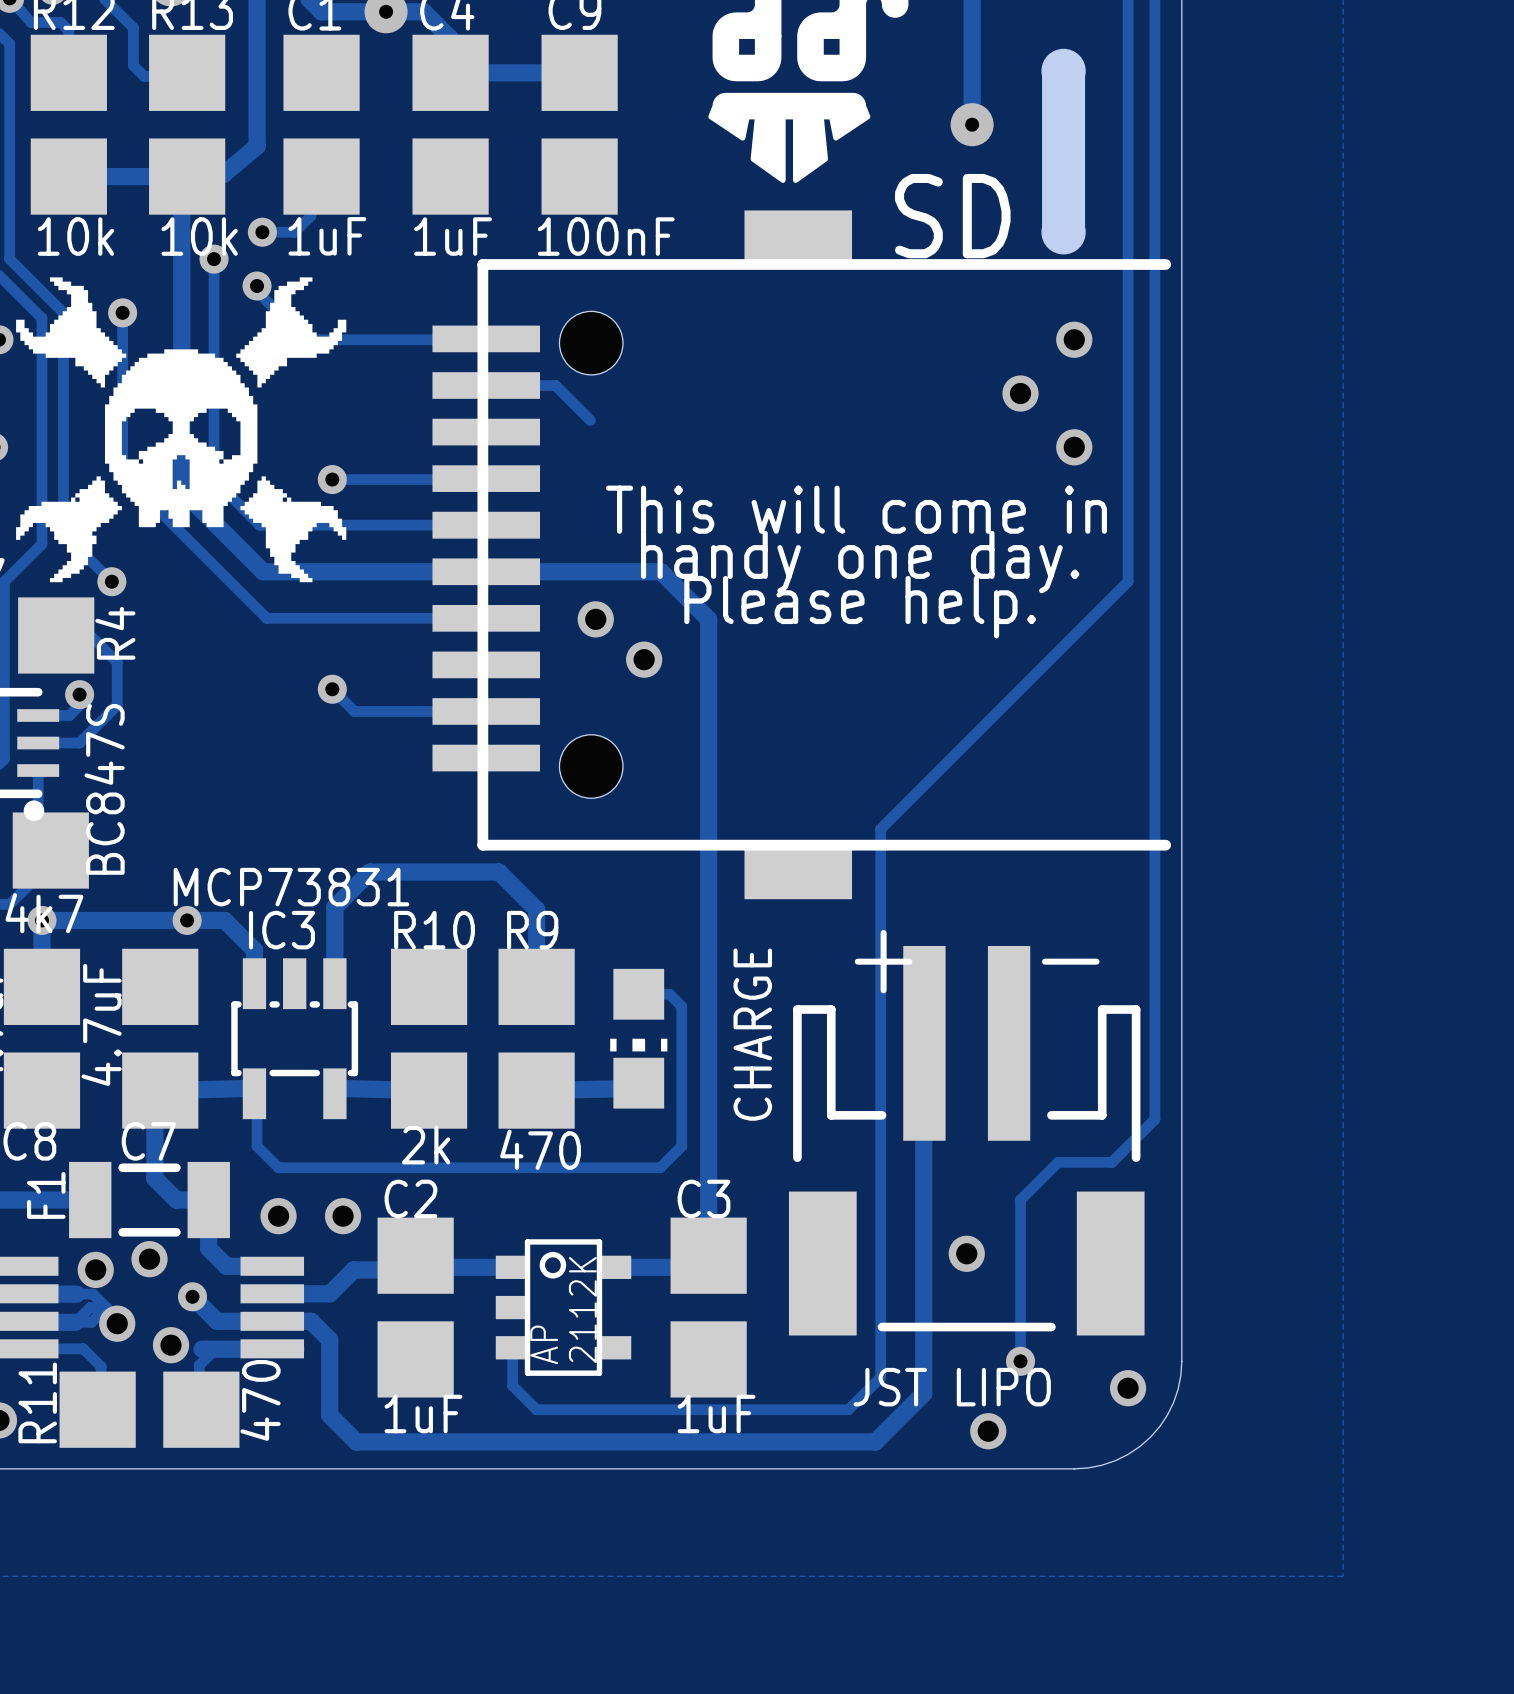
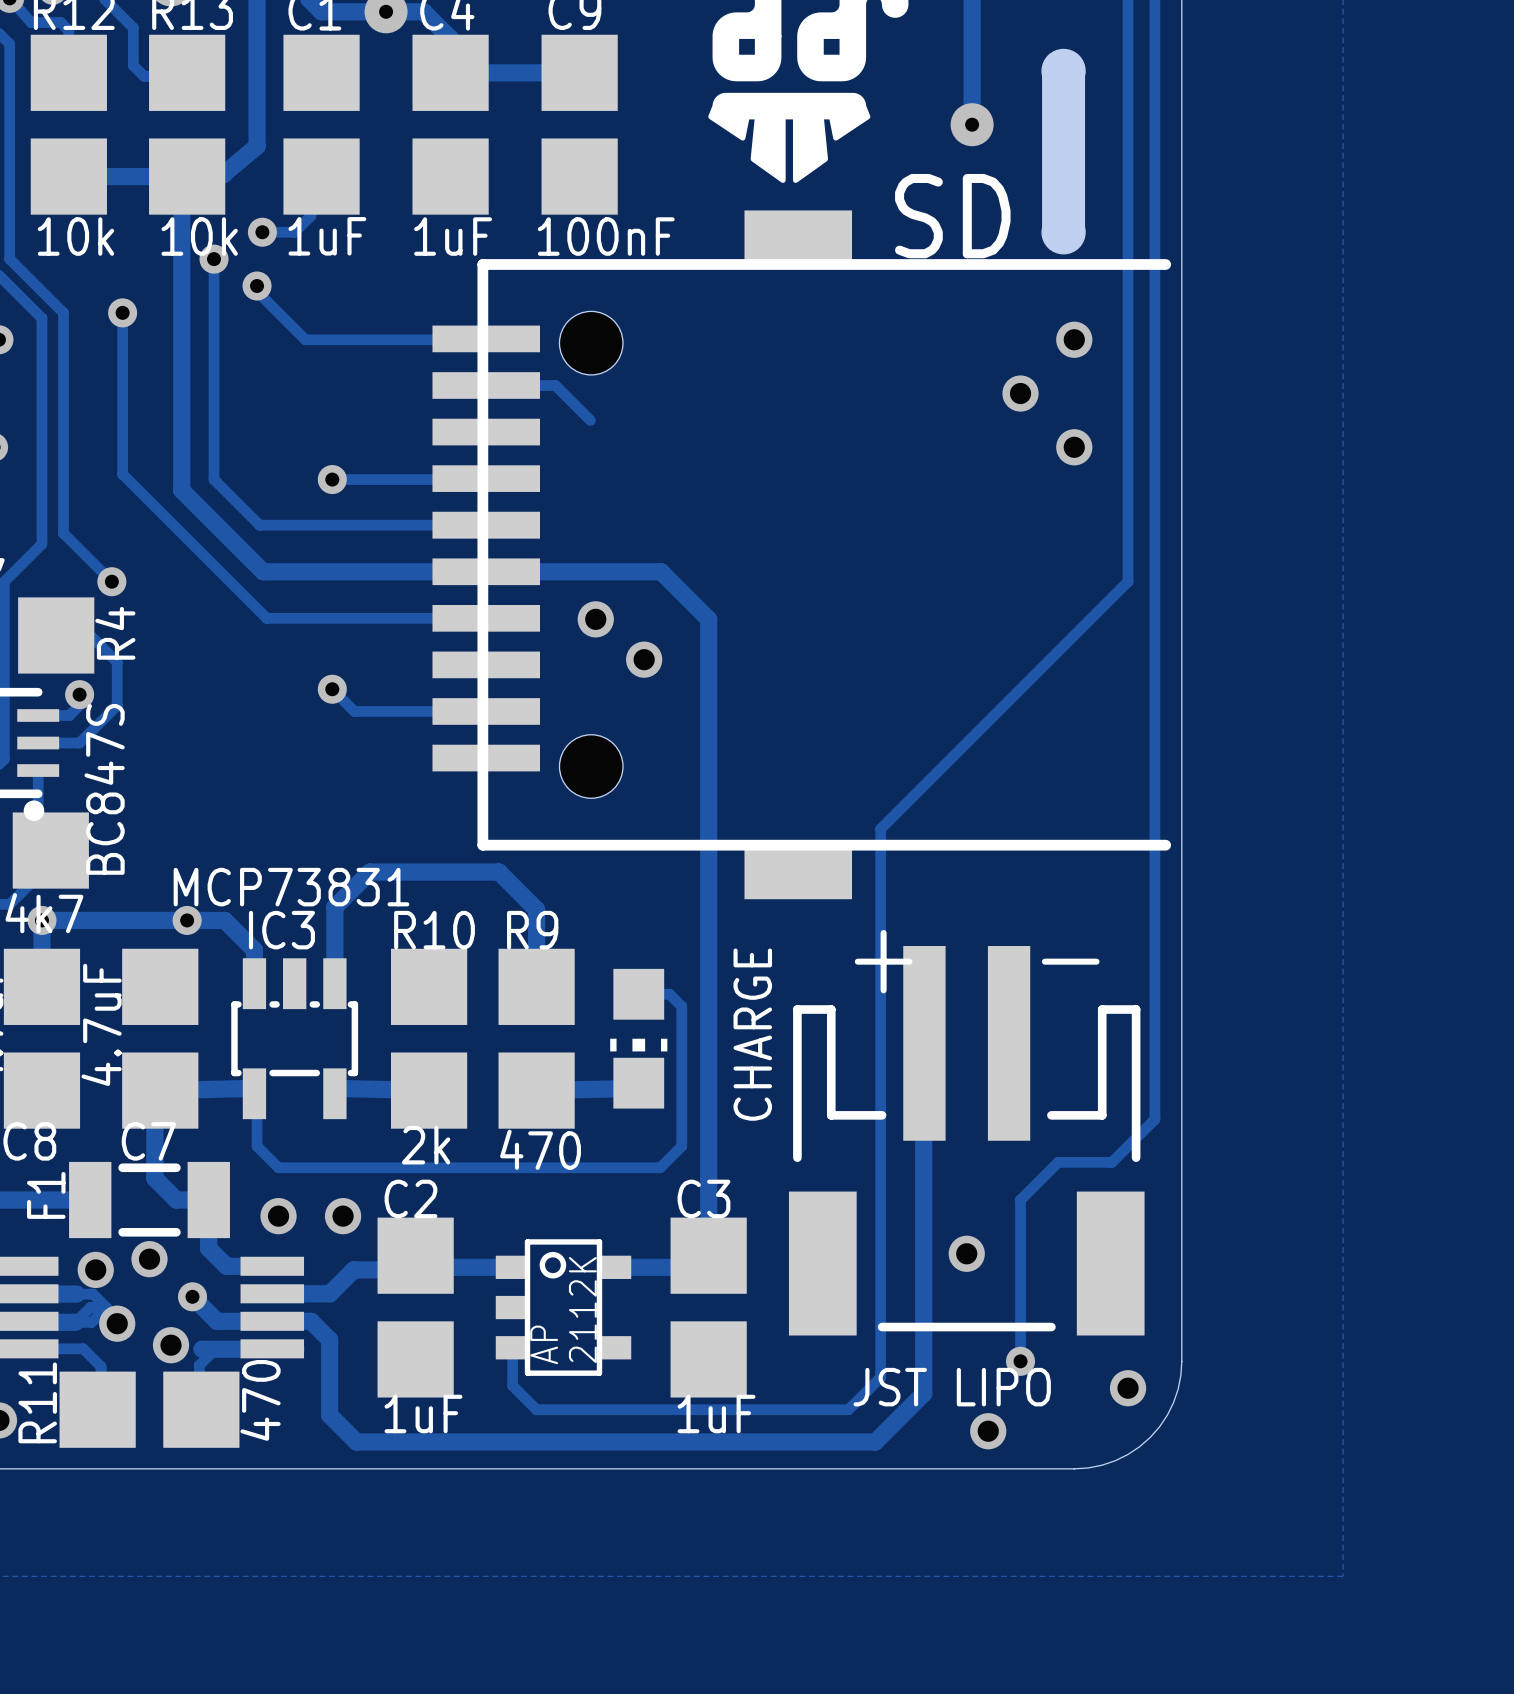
drawing: [16, 277, 347, 583] -> none
text: This will come in (856, 509) -> none
text: handy one day. (860, 562) -> none
text: Please help. (860, 607) -> none

